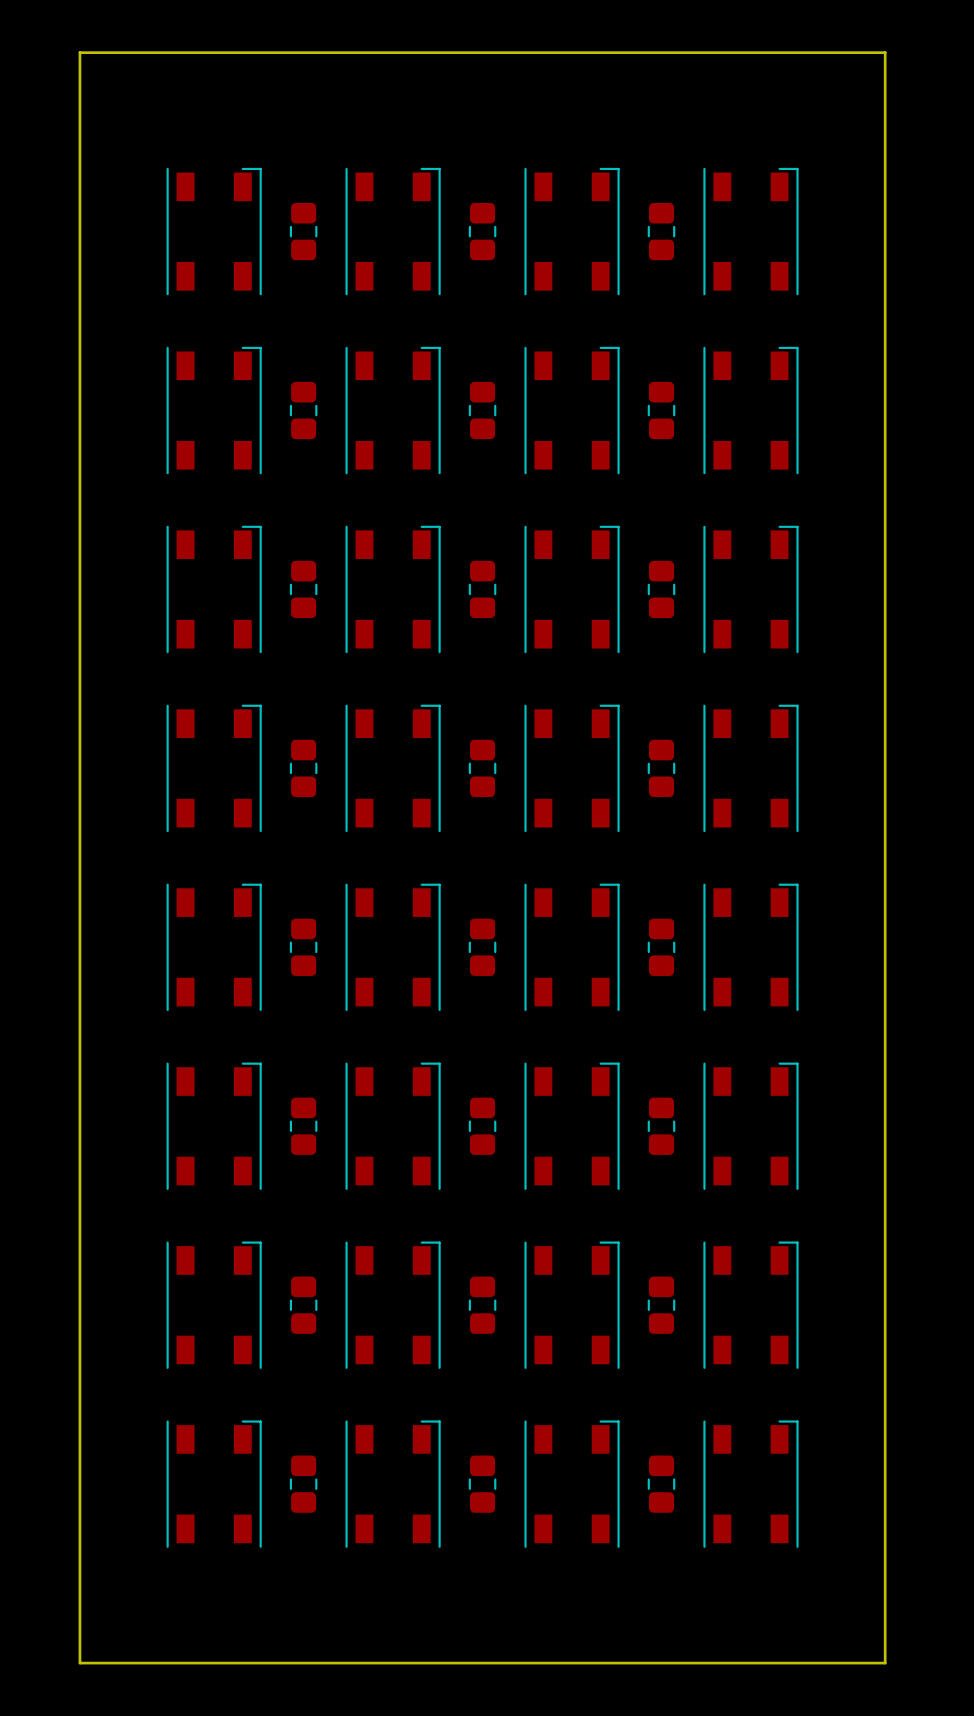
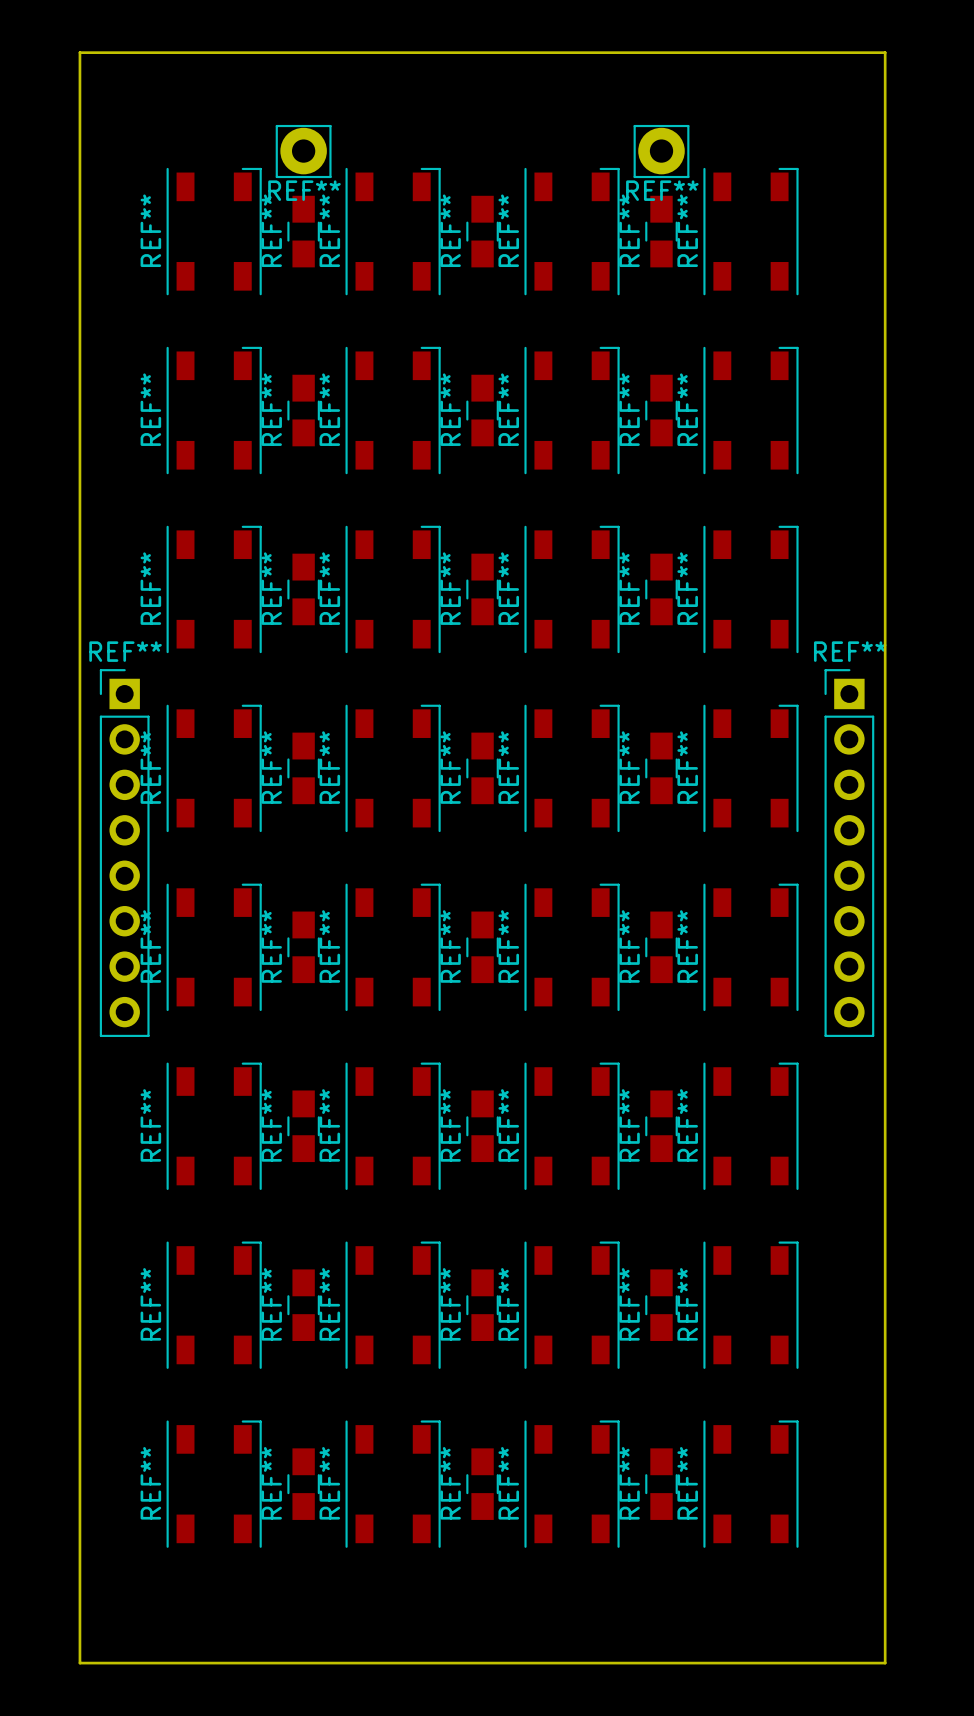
REF**: none -> (303, 151)
REF**: none -> (661, 151)
REF** name: none -> REF** (150, 230)
part: (303, 231) -> none
REF**: none -> (303, 231)
REF** name: none -> REF** (329, 230)
part: (482, 231) -> none
REF**: none -> (482, 231)
REF** name: none -> REF** (508, 230)
part: (661, 231) -> none
REF**: none -> (661, 231)
REF** name: none -> REF** (687, 230)
REF** name: none -> REF** (150, 409)
part: (303, 410) -> none
REF**: none -> (303, 410)
REF** name: none -> REF** (329, 409)
part: (482, 410) -> none
REF**: none -> (482, 410)
REF** name: none -> REF** (508, 409)
part: (661, 410) -> none
REF**: none -> (661, 410)
REF** name: none -> REF** (687, 409)
REF** name: none -> REF** (150, 588)
part: (303, 589) -> none
REF**: none -> (303, 589)
REF** name: none -> REF** (329, 588)
part: (482, 589) -> none
REF**: none -> (482, 589)
REF** name: none -> REF** (508, 588)
part: (661, 589) -> none
REF**: none -> (661, 589)
REF** name: none -> REF** (687, 588)
REF** name: none -> REF** (150, 767)
part: (303, 768) -> none
REF**: none -> (303, 768)
REF** name: none -> REF** (329, 767)
part: (482, 768) -> none
REF**: none -> (482, 768)
REF** name: none -> REF** (508, 767)
part: (661, 768) -> none
REF**: none -> (661, 768)
REF** name: none -> REF** (687, 767)
REF**: none -> (124, 853)
REF**: none -> (849, 853)
REF** name: none -> REF** (150, 946)
part: (303, 947) -> none
REF**: none -> (303, 947)
REF** name: none -> REF** (329, 946)
part: (482, 947) -> none
REF**: none -> (482, 947)
REF** name: none -> REF** (508, 946)
part: (661, 947) -> none
REF**: none -> (661, 947)
REF** name: none -> REF** (687, 946)
REF** name: none -> REF** (150, 1125)
part: (303, 1126) -> none
REF**: none -> (303, 1126)
REF** name: none -> REF** (329, 1125)
part: (482, 1126) -> none
REF**: none -> (482, 1126)
REF** name: none -> REF** (508, 1125)
part: (661, 1126) -> none
REF**: none -> (661, 1126)
REF** name: none -> REF** (687, 1125)
REF** name: none -> REF** (150, 1304)
part: (303, 1305) -> none
REF**: none -> (303, 1305)
REF** name: none -> REF** (329, 1304)
part: (482, 1305) -> none
REF**: none -> (482, 1305)
REF** name: none -> REF** (508, 1304)
part: (661, 1305) -> none
REF**: none -> (661, 1305)
REF** name: none -> REF** (687, 1304)
REF** name: none -> REF** (150, 1483)
part: (303, 1484) -> none
REF**: none -> (303, 1484)
REF** name: none -> REF** (329, 1483)
part: (482, 1484) -> none
REF**: none -> (482, 1484)
REF** name: none -> REF** (508, 1483)
part: (661, 1484) -> none
REF**: none -> (661, 1484)
REF** name: none -> REF** (687, 1483)

